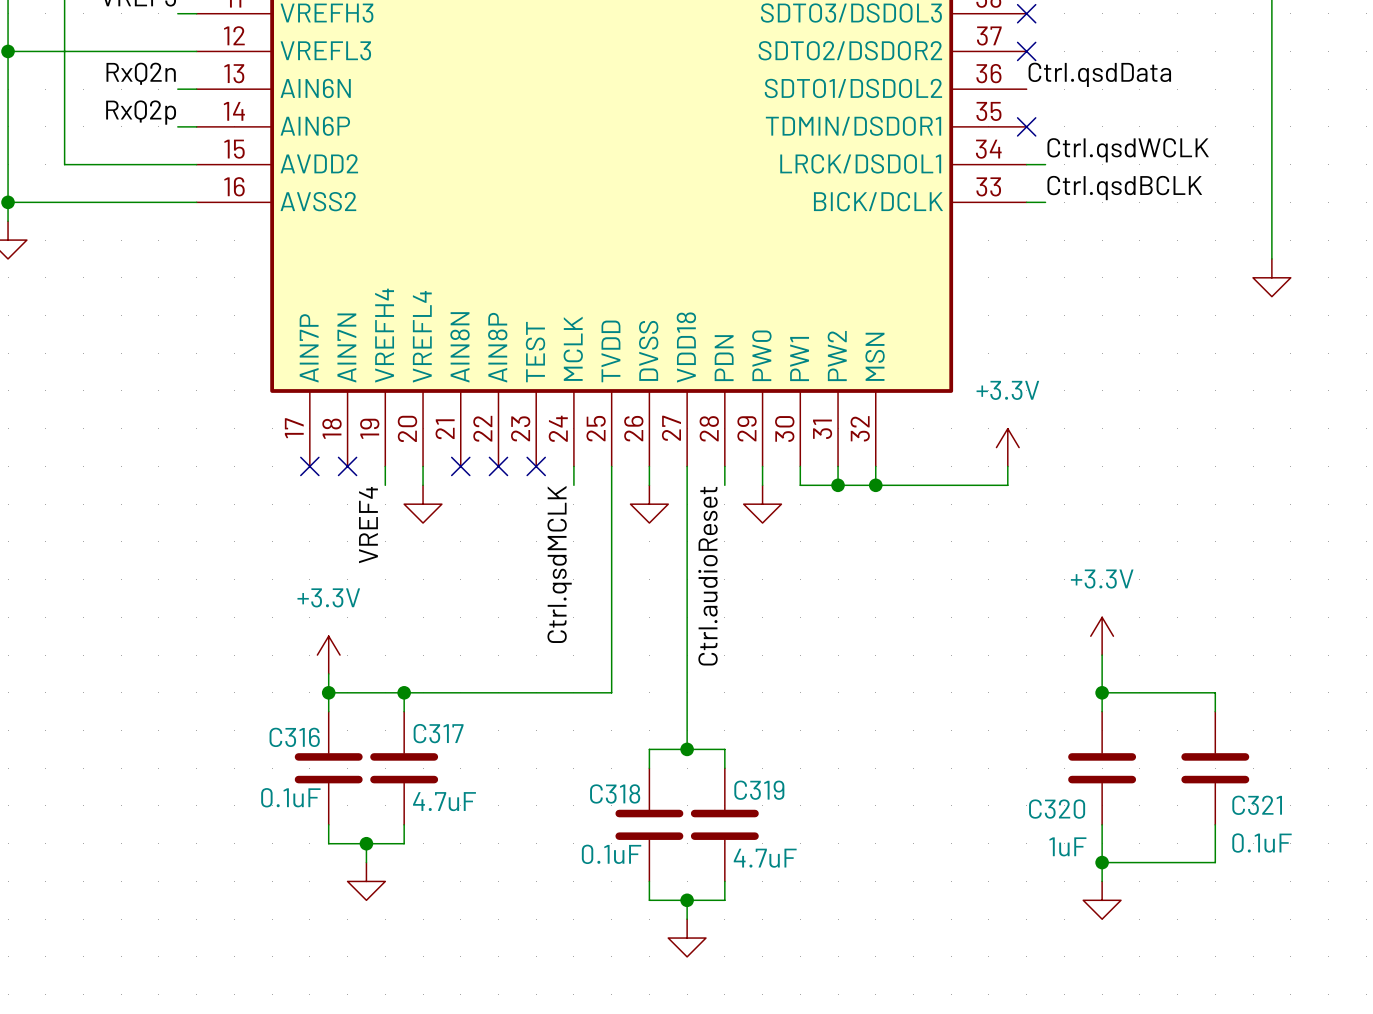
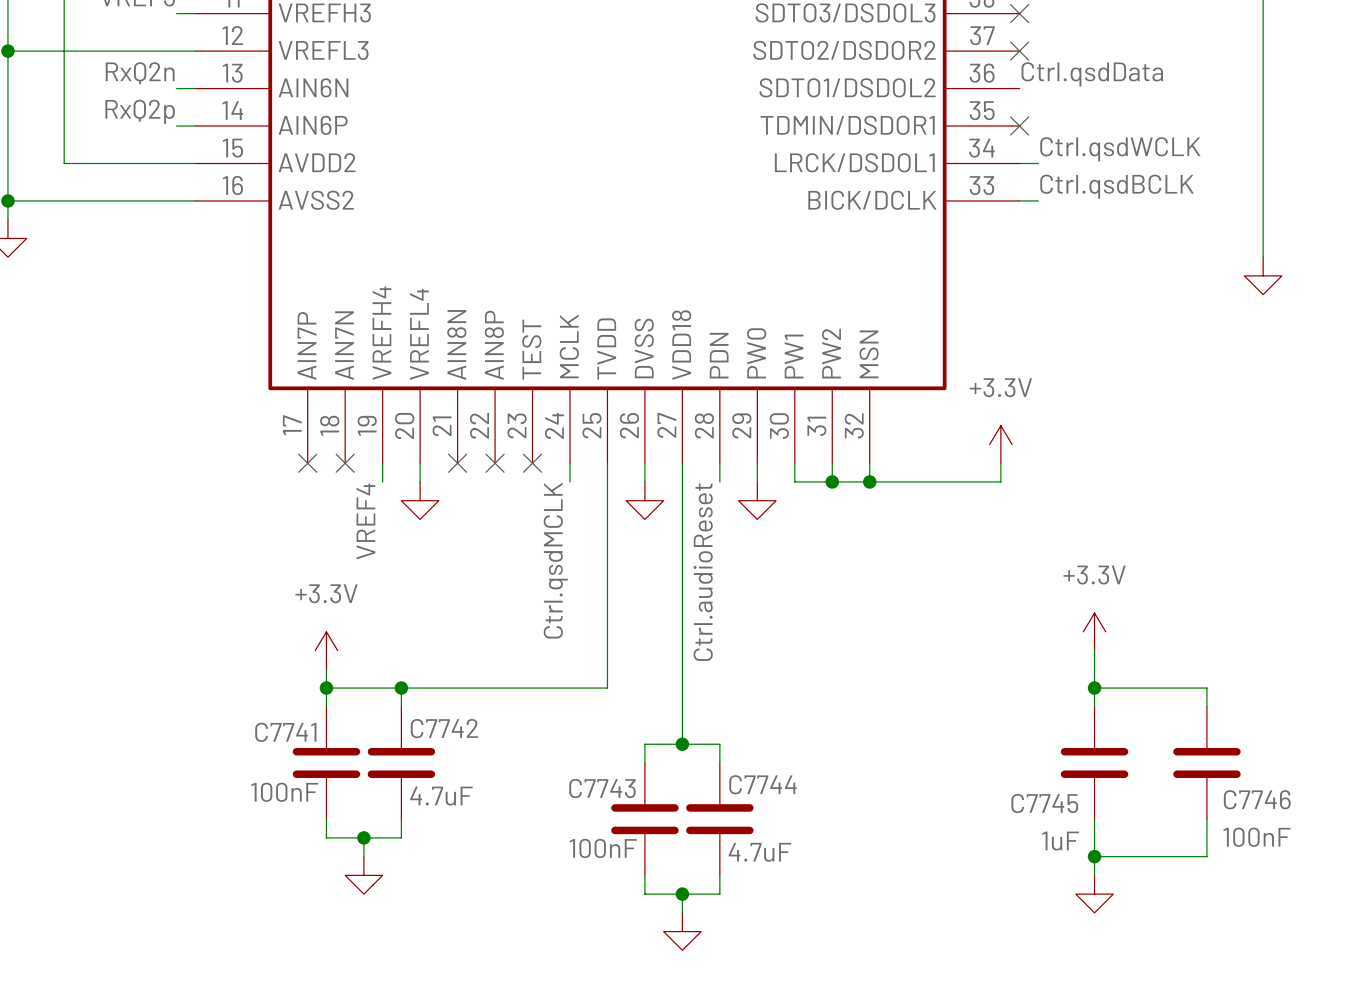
C317 name: C317 (438, 733) -> C7742 (444, 728)
C316 name: C316 (294, 737) -> C7741 (285, 732)
C319 name: C319 (759, 790) -> C7744 (763, 784)
C318 name: C318 (615, 793) -> C7743 (602, 788)
C316 value: 0.1uF (290, 797) -> 100nF (284, 792)
C321 name: C321 (1257, 805) -> C7746 (1257, 799)
C320 name: C320 (1057, 809) -> C7745 (1044, 803)
C321 value: 0.1uF (1262, 843) -> 100nF (1257, 837)
C318 value: 0.1uF (611, 854) -> 100nF (603, 848)

